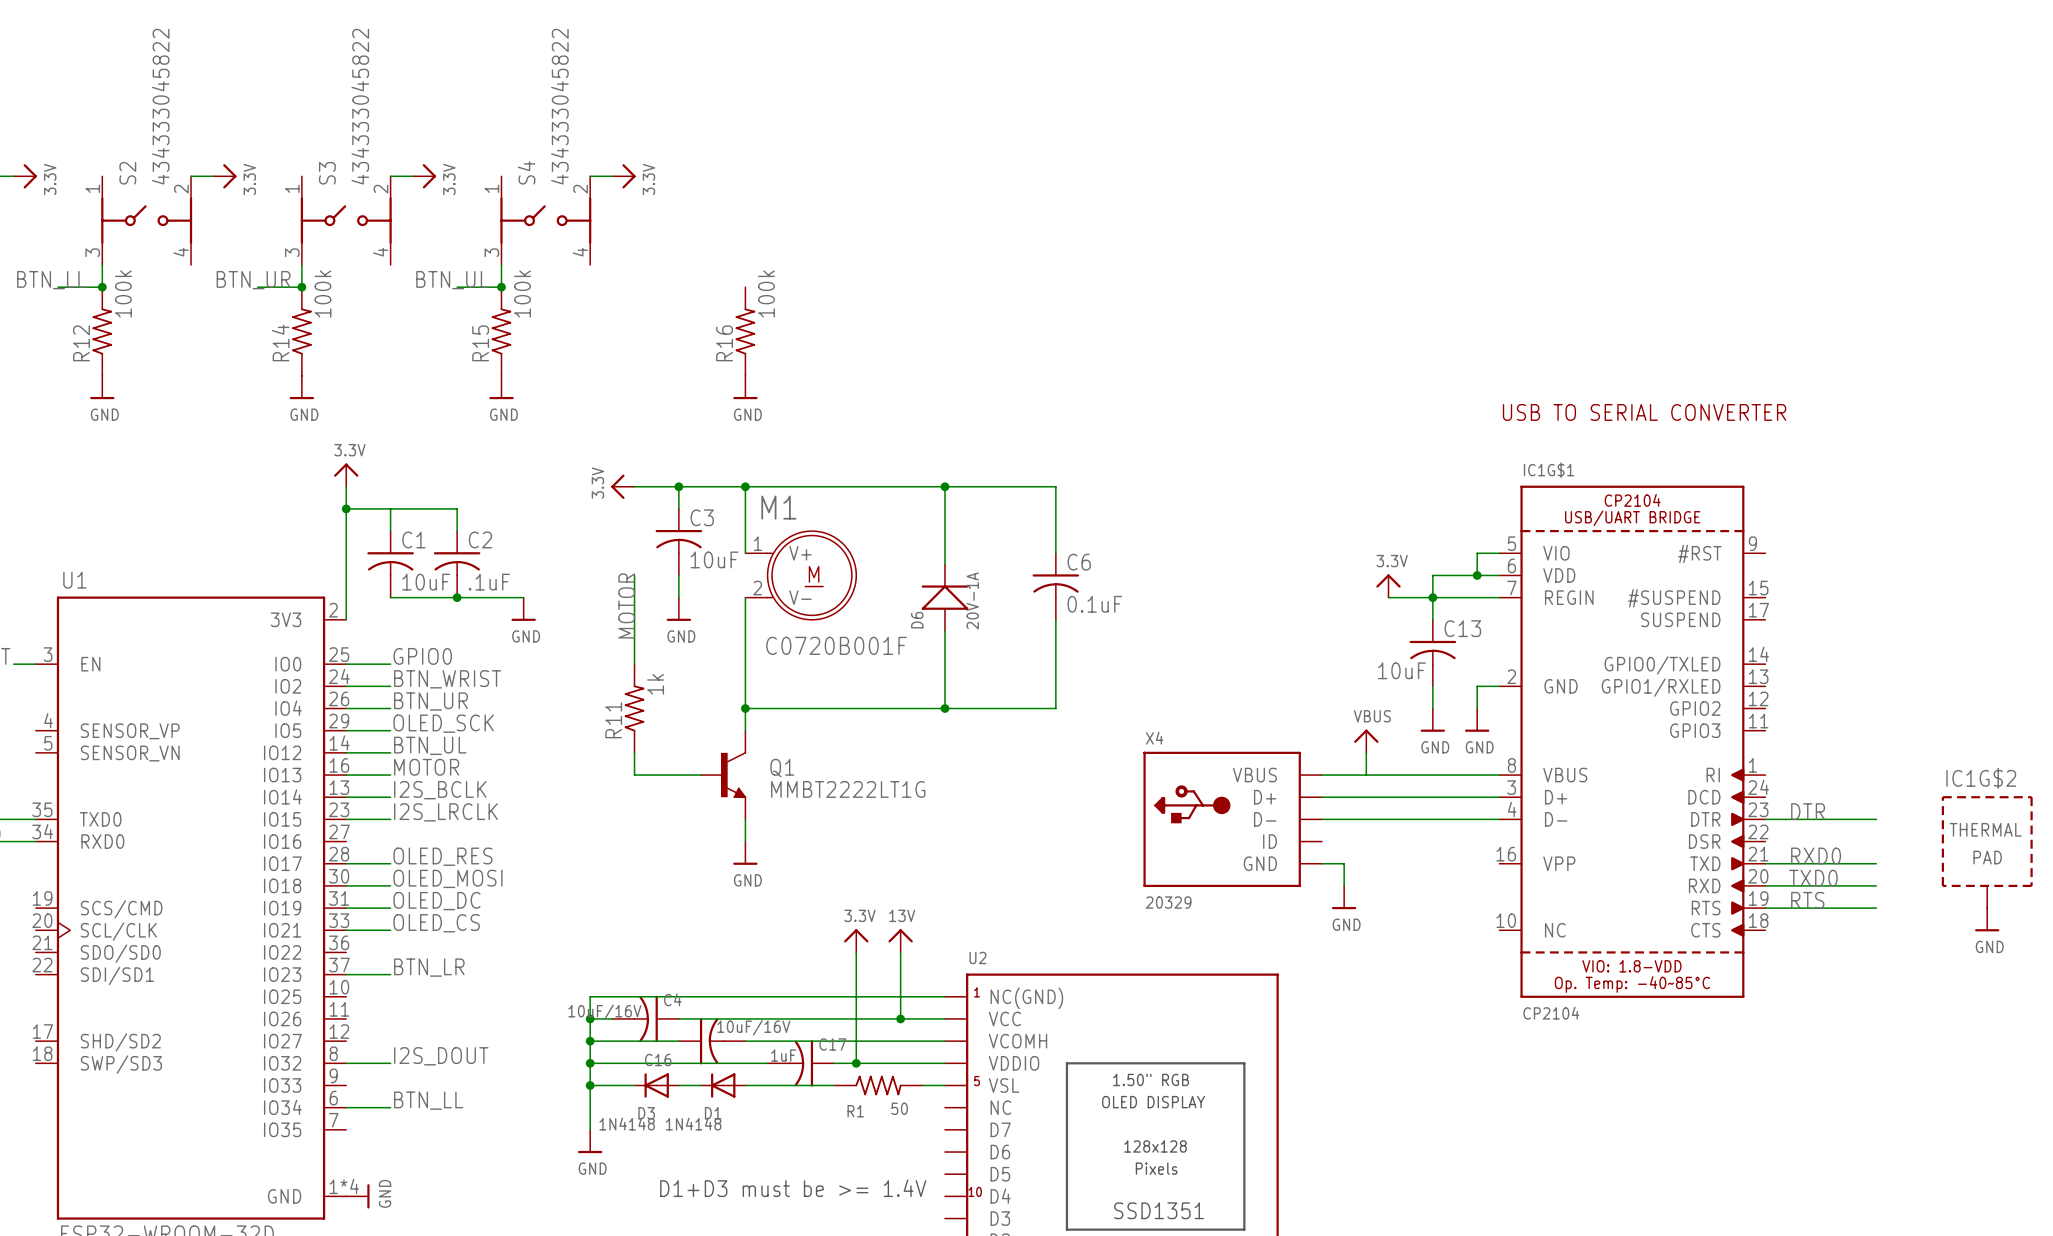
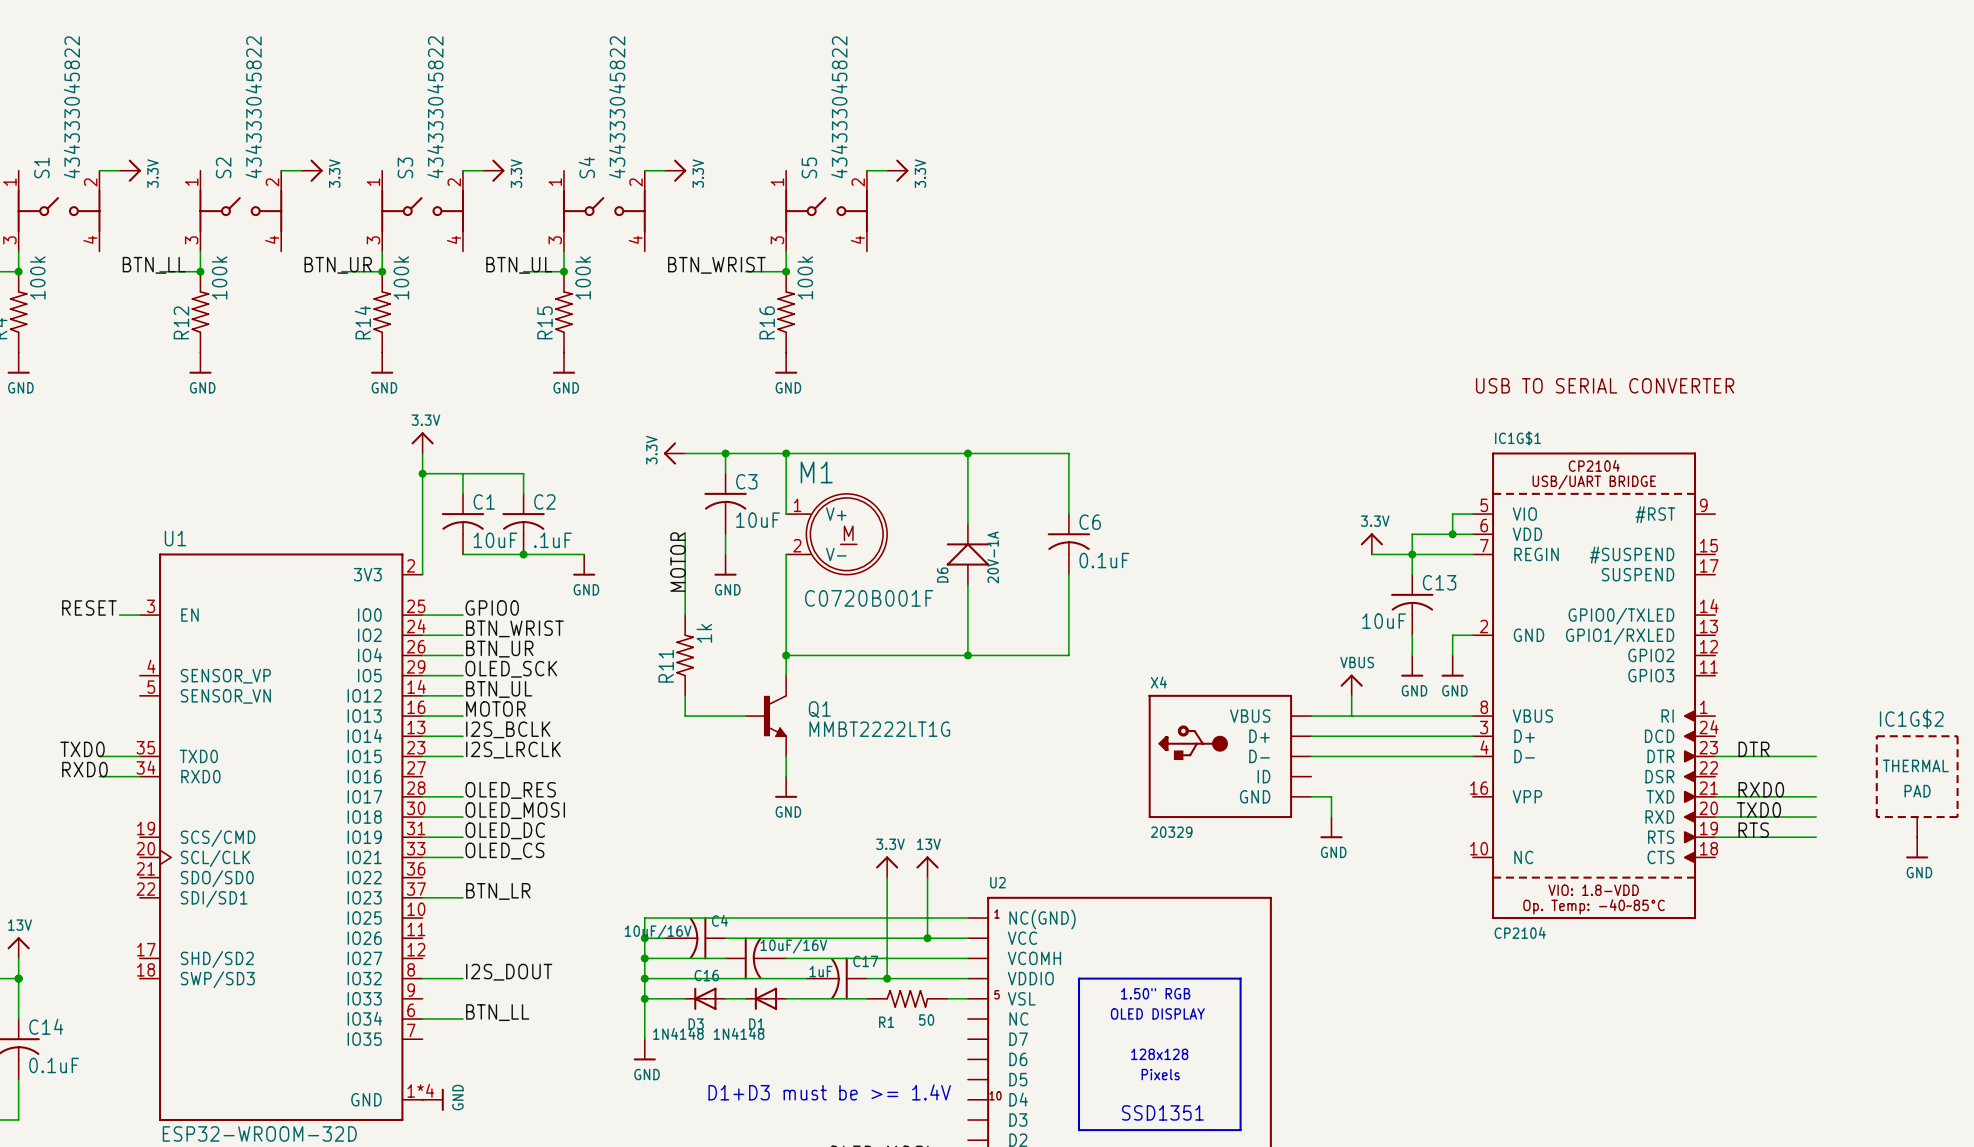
wire: none -> (866, 170) (887, 170)
power symbol: none -> 3.3V (897, 170)
S5: none -> 434333045822 (826, 211)
wire: none -> (786, 251) (786, 271) (745, 271)
label: none -> BTN_WRIST (716, 265)
junction: none -> (786, 271)

